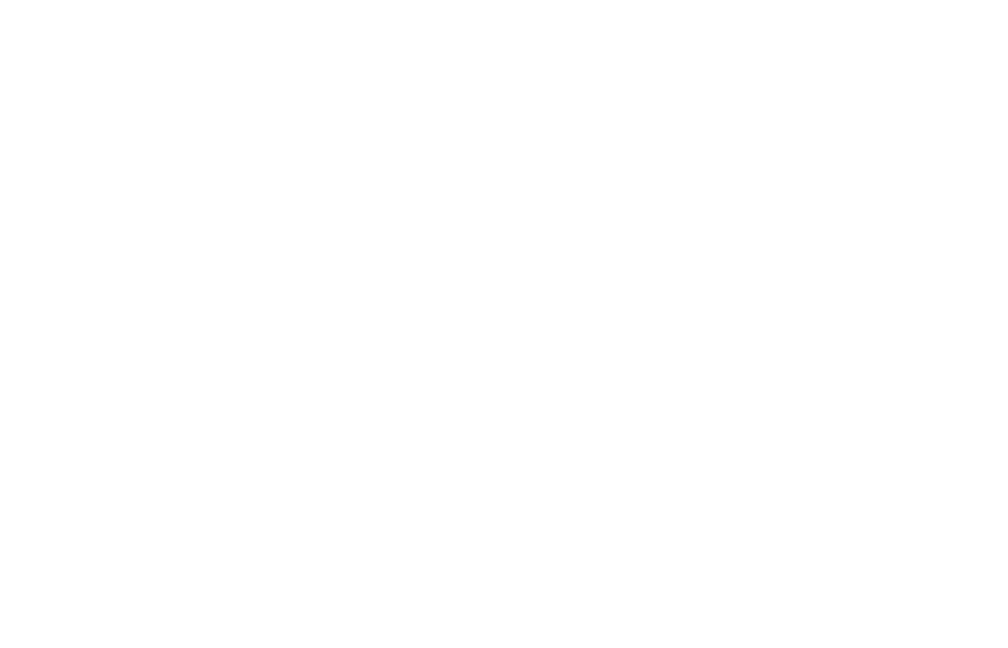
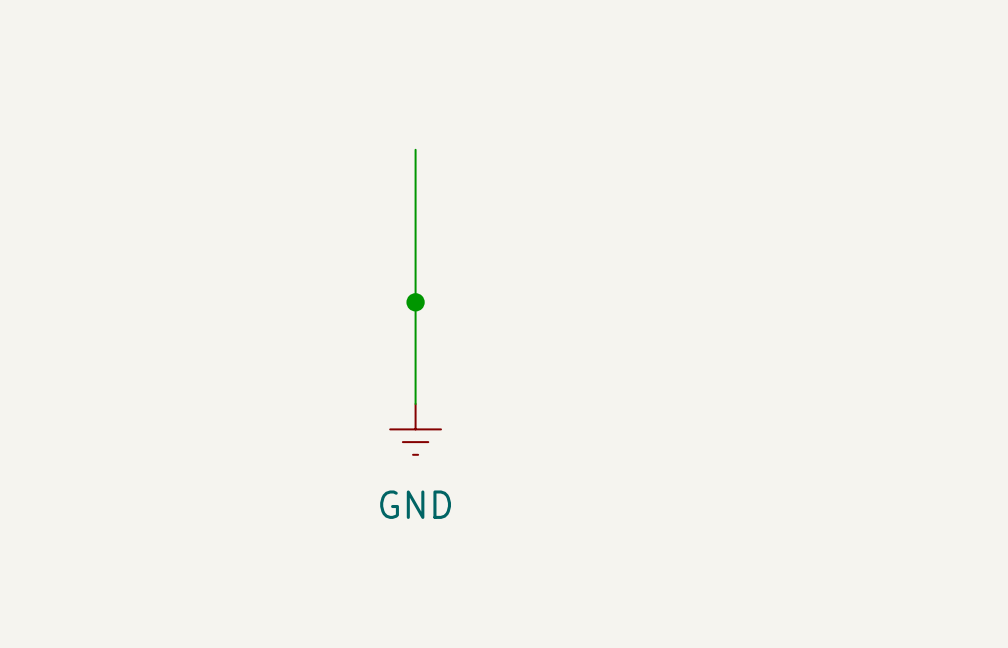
wire: none -> (415, 149) (415, 403)
junction: none -> (415, 302)
power symbol: none -> GND (415, 429)

